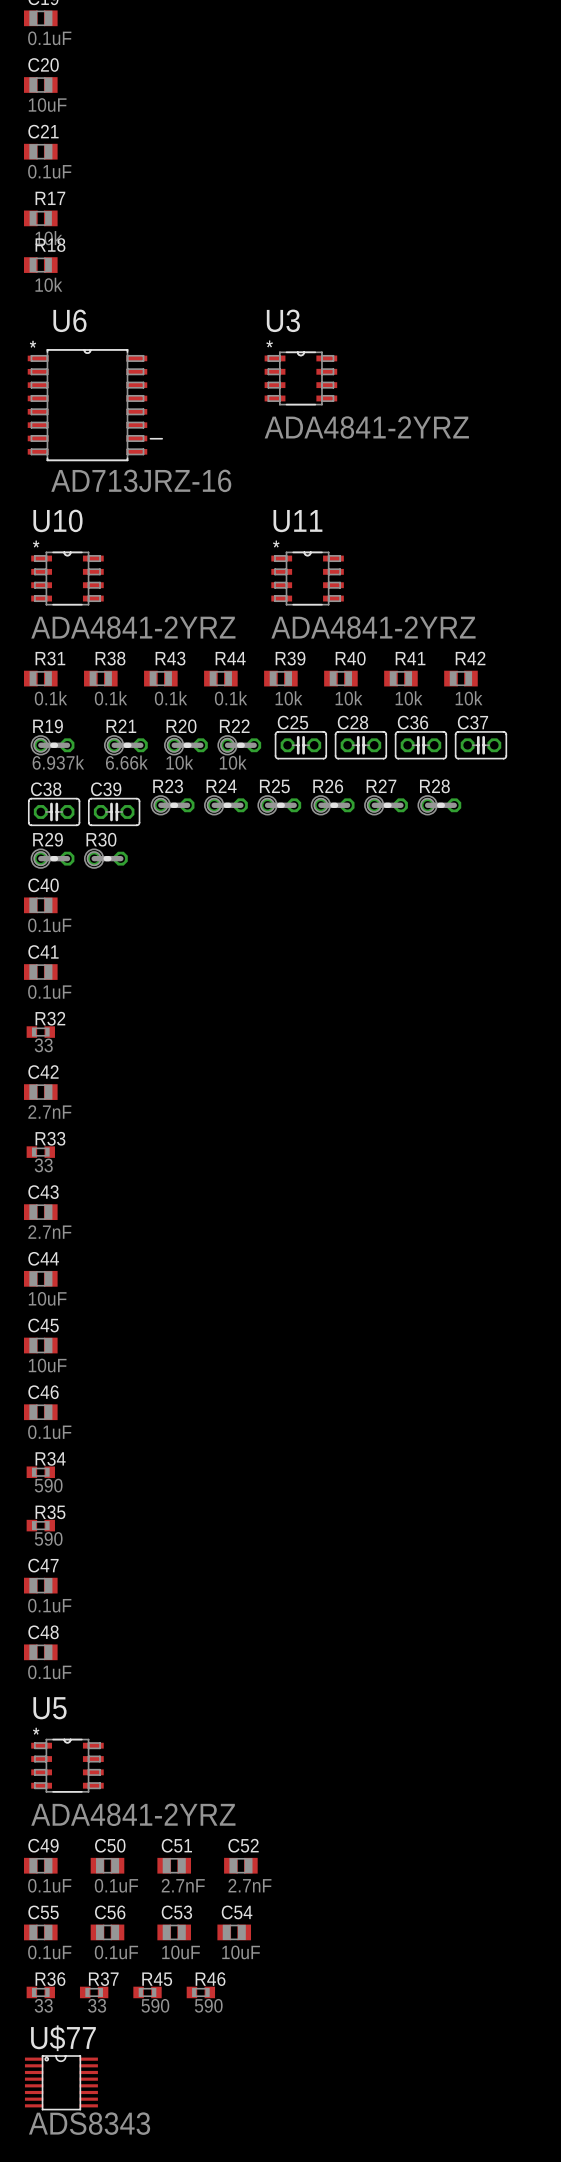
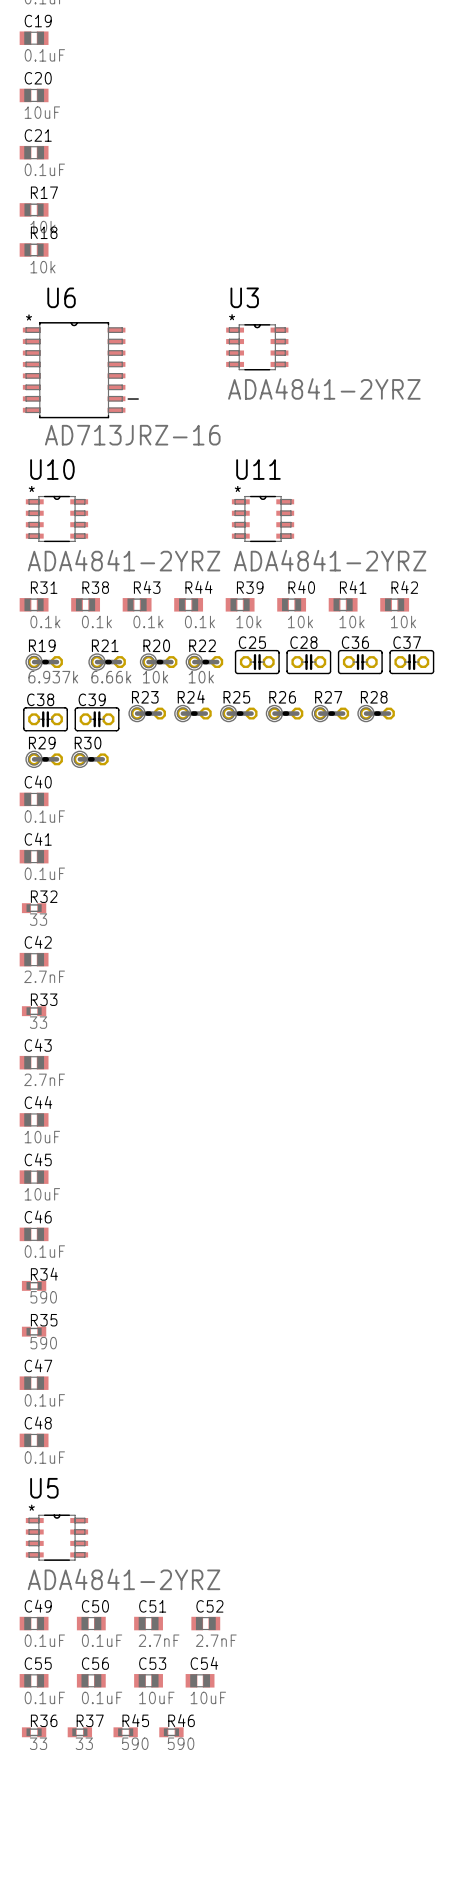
U$77: ADS8343 (61, 2082) -> none

